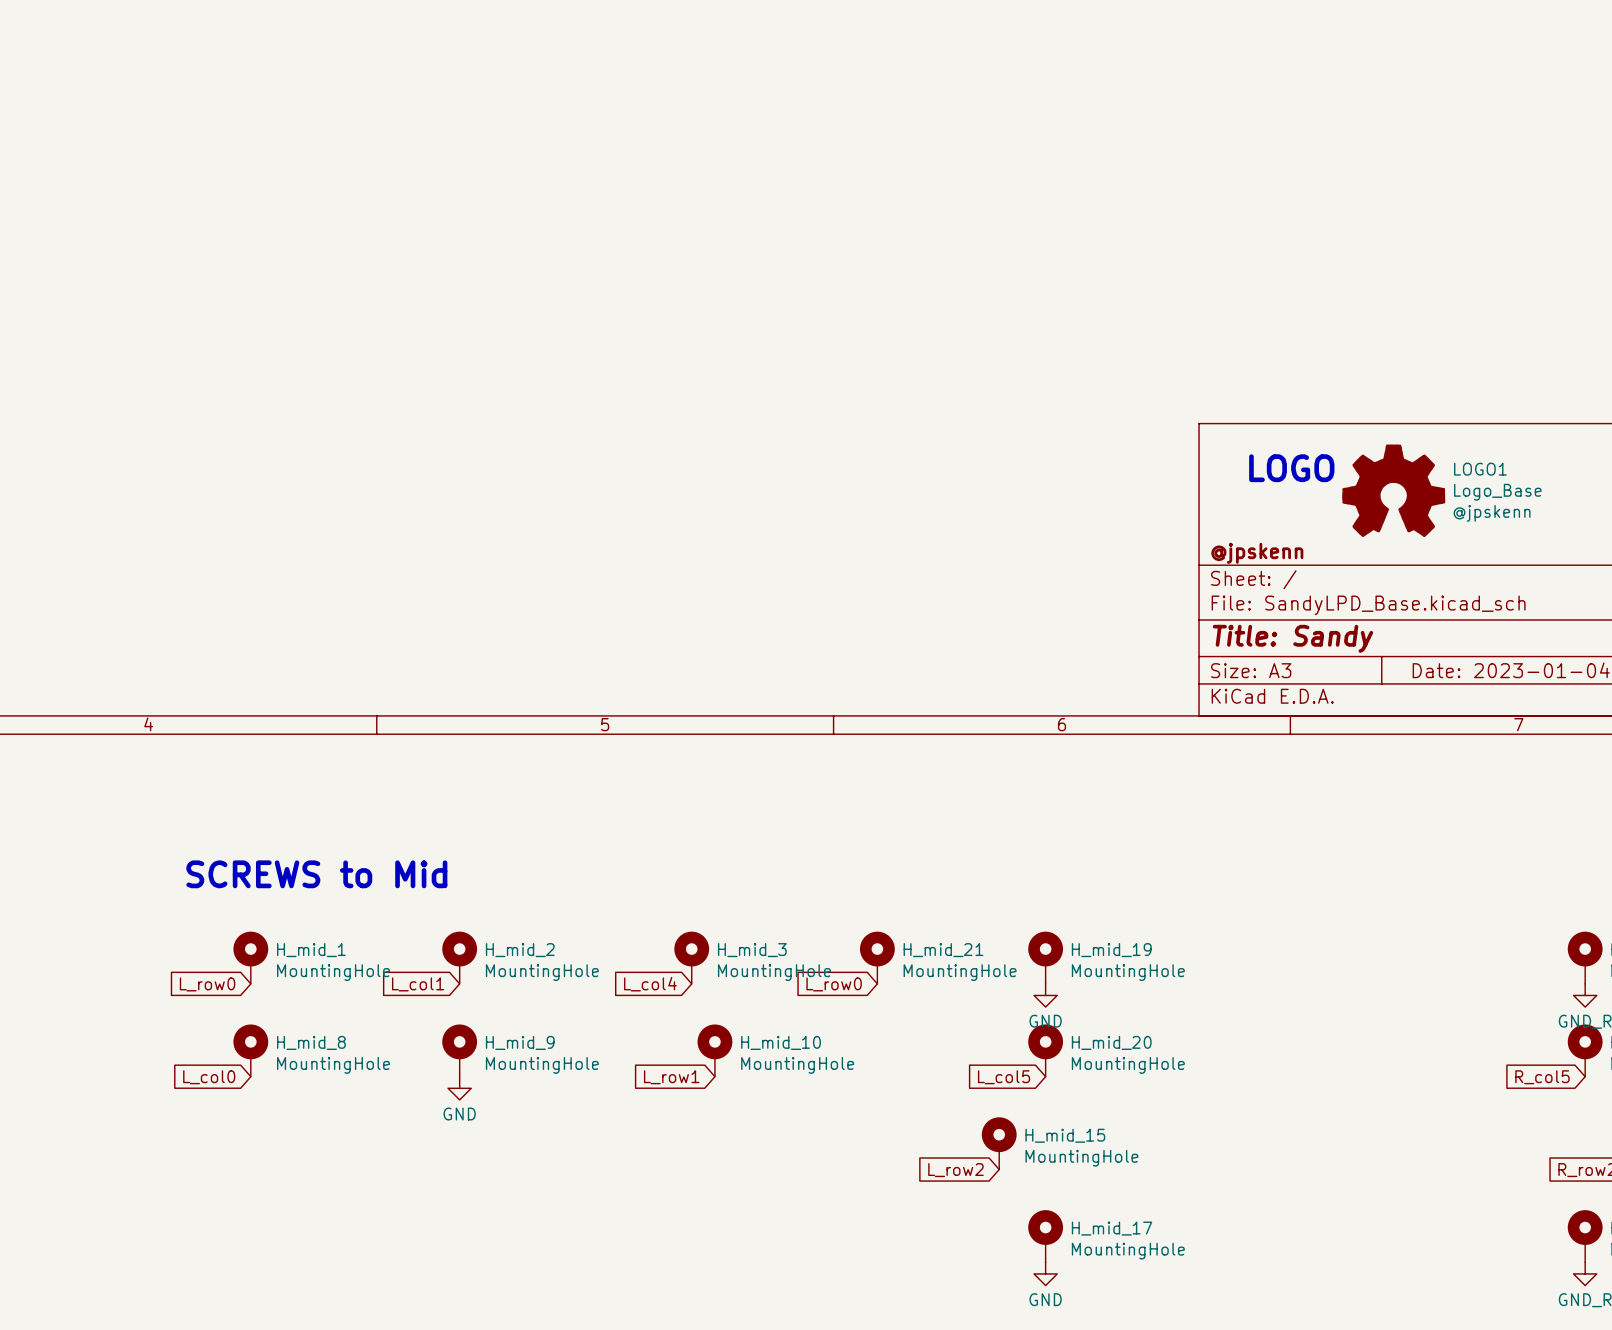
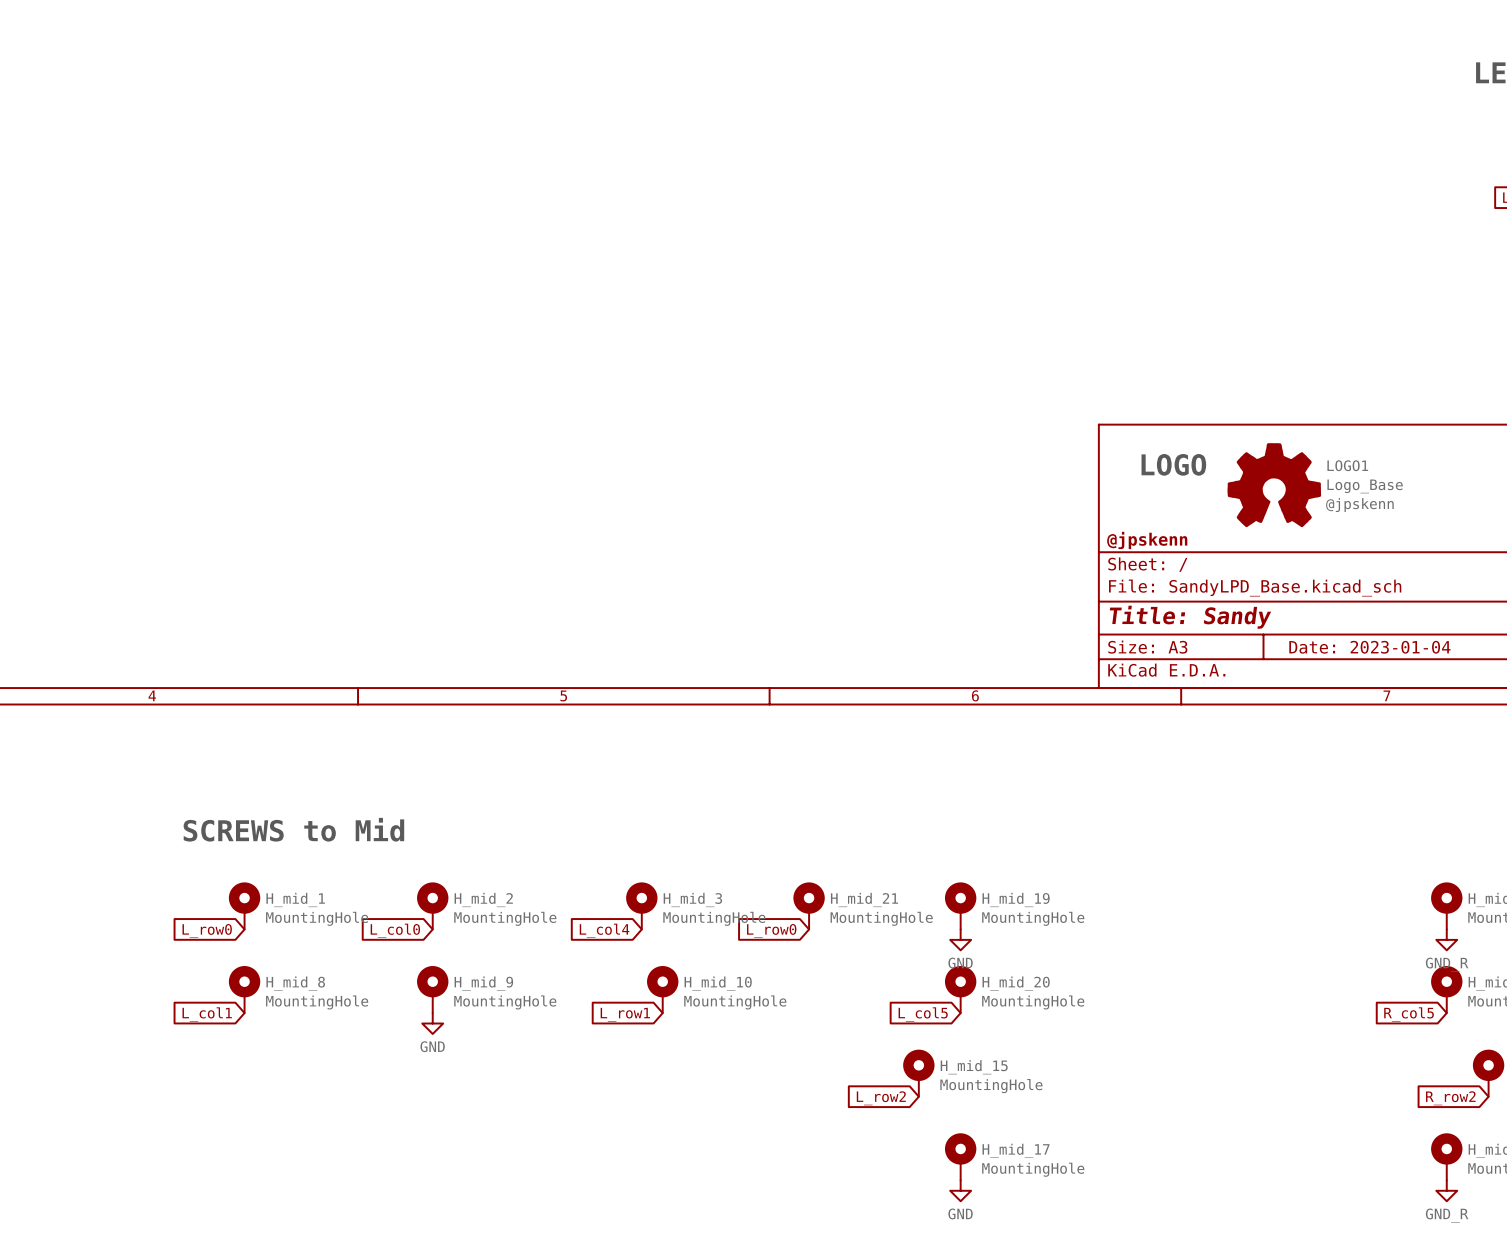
global label: L_col1 (418, 984) -> L_col0 (395, 930)
global label: L_col0 (209, 1077) -> L_col1 (207, 1014)

